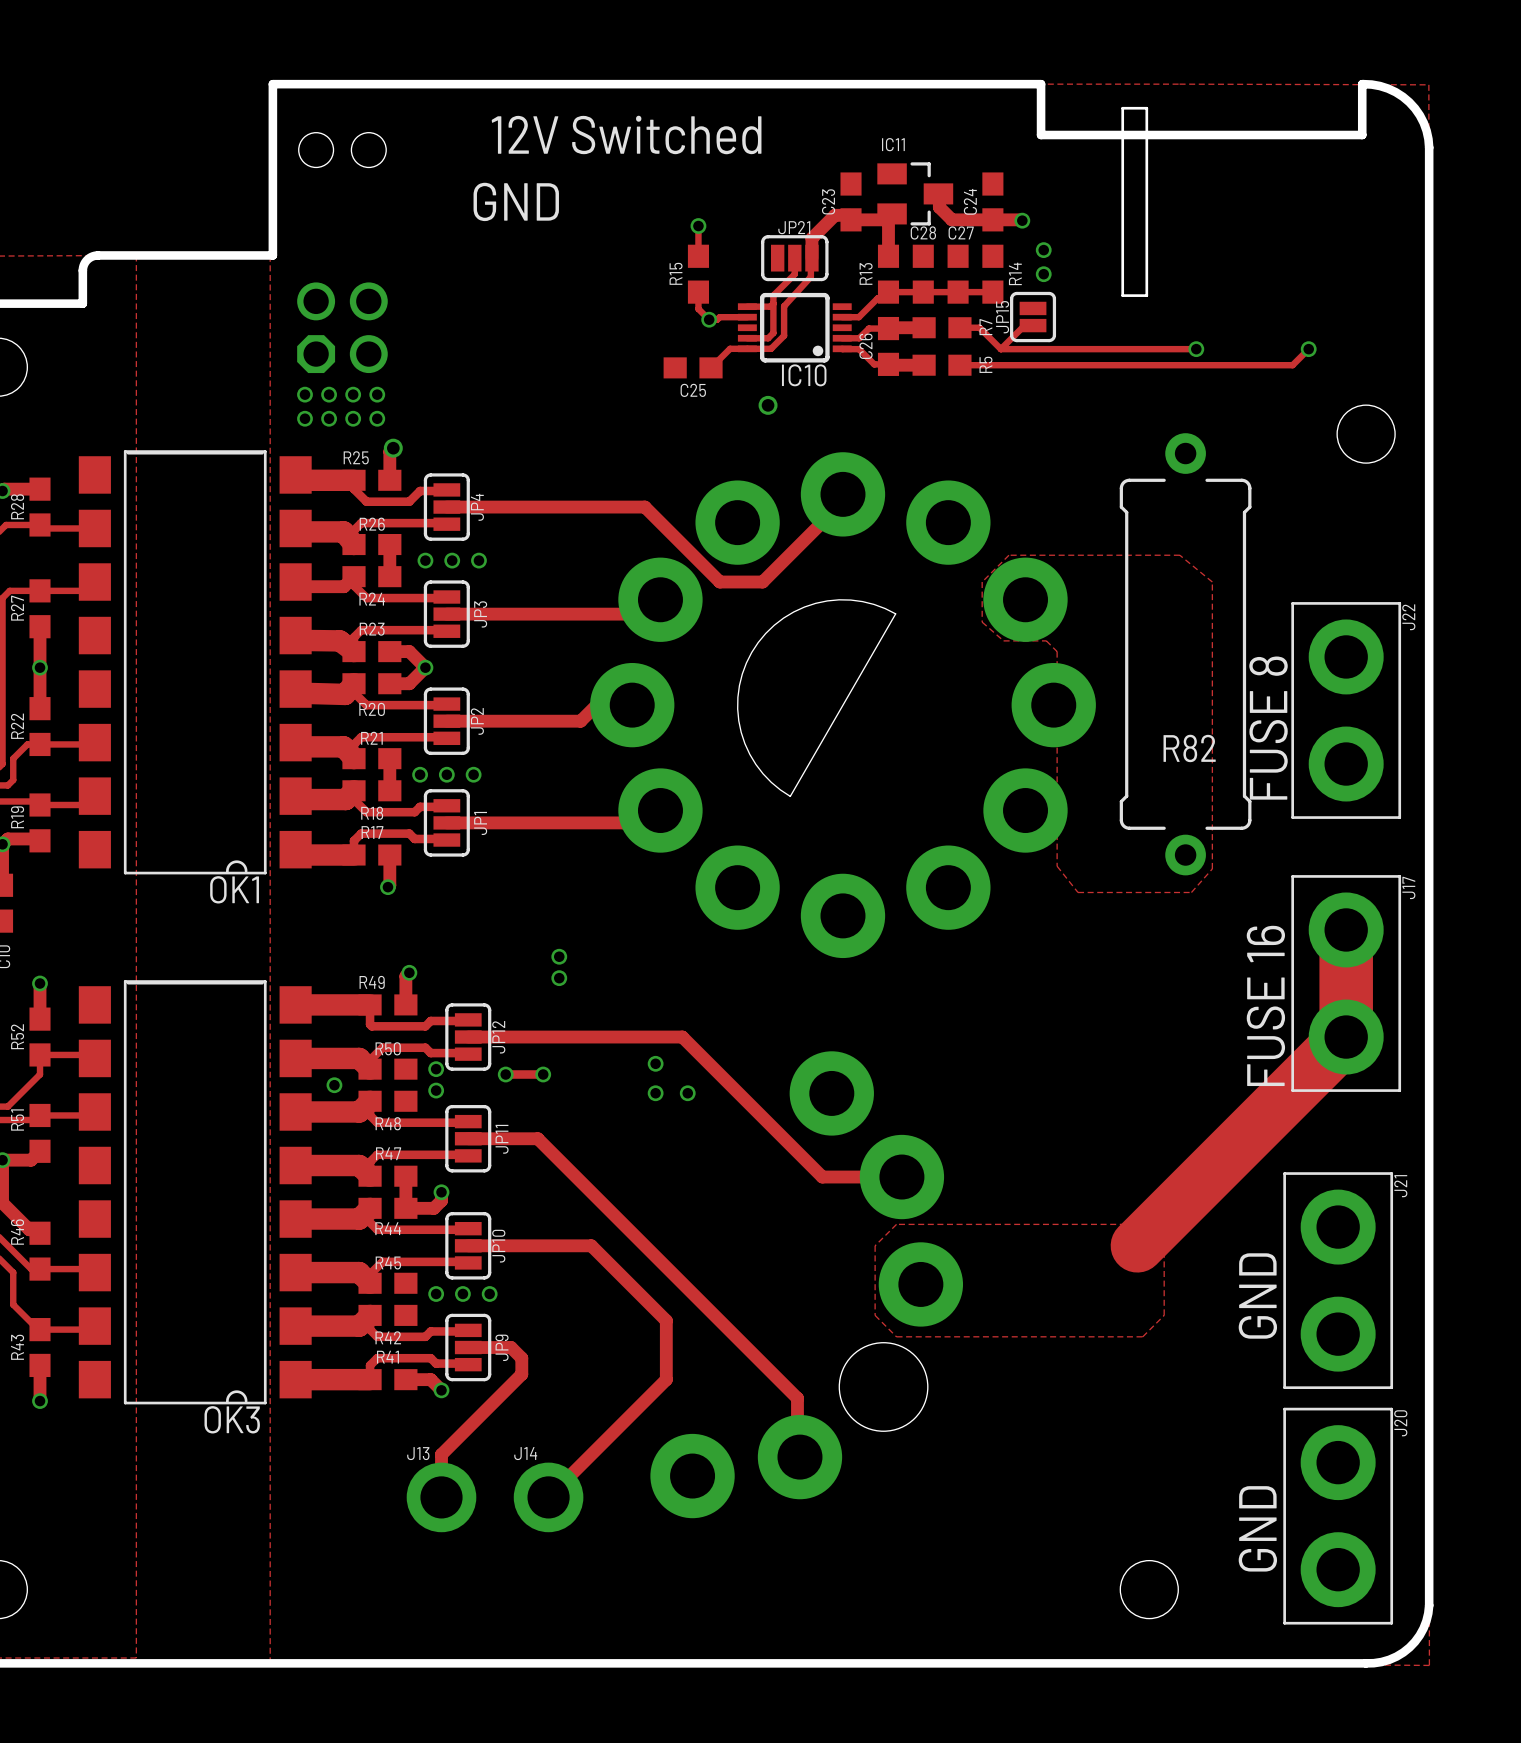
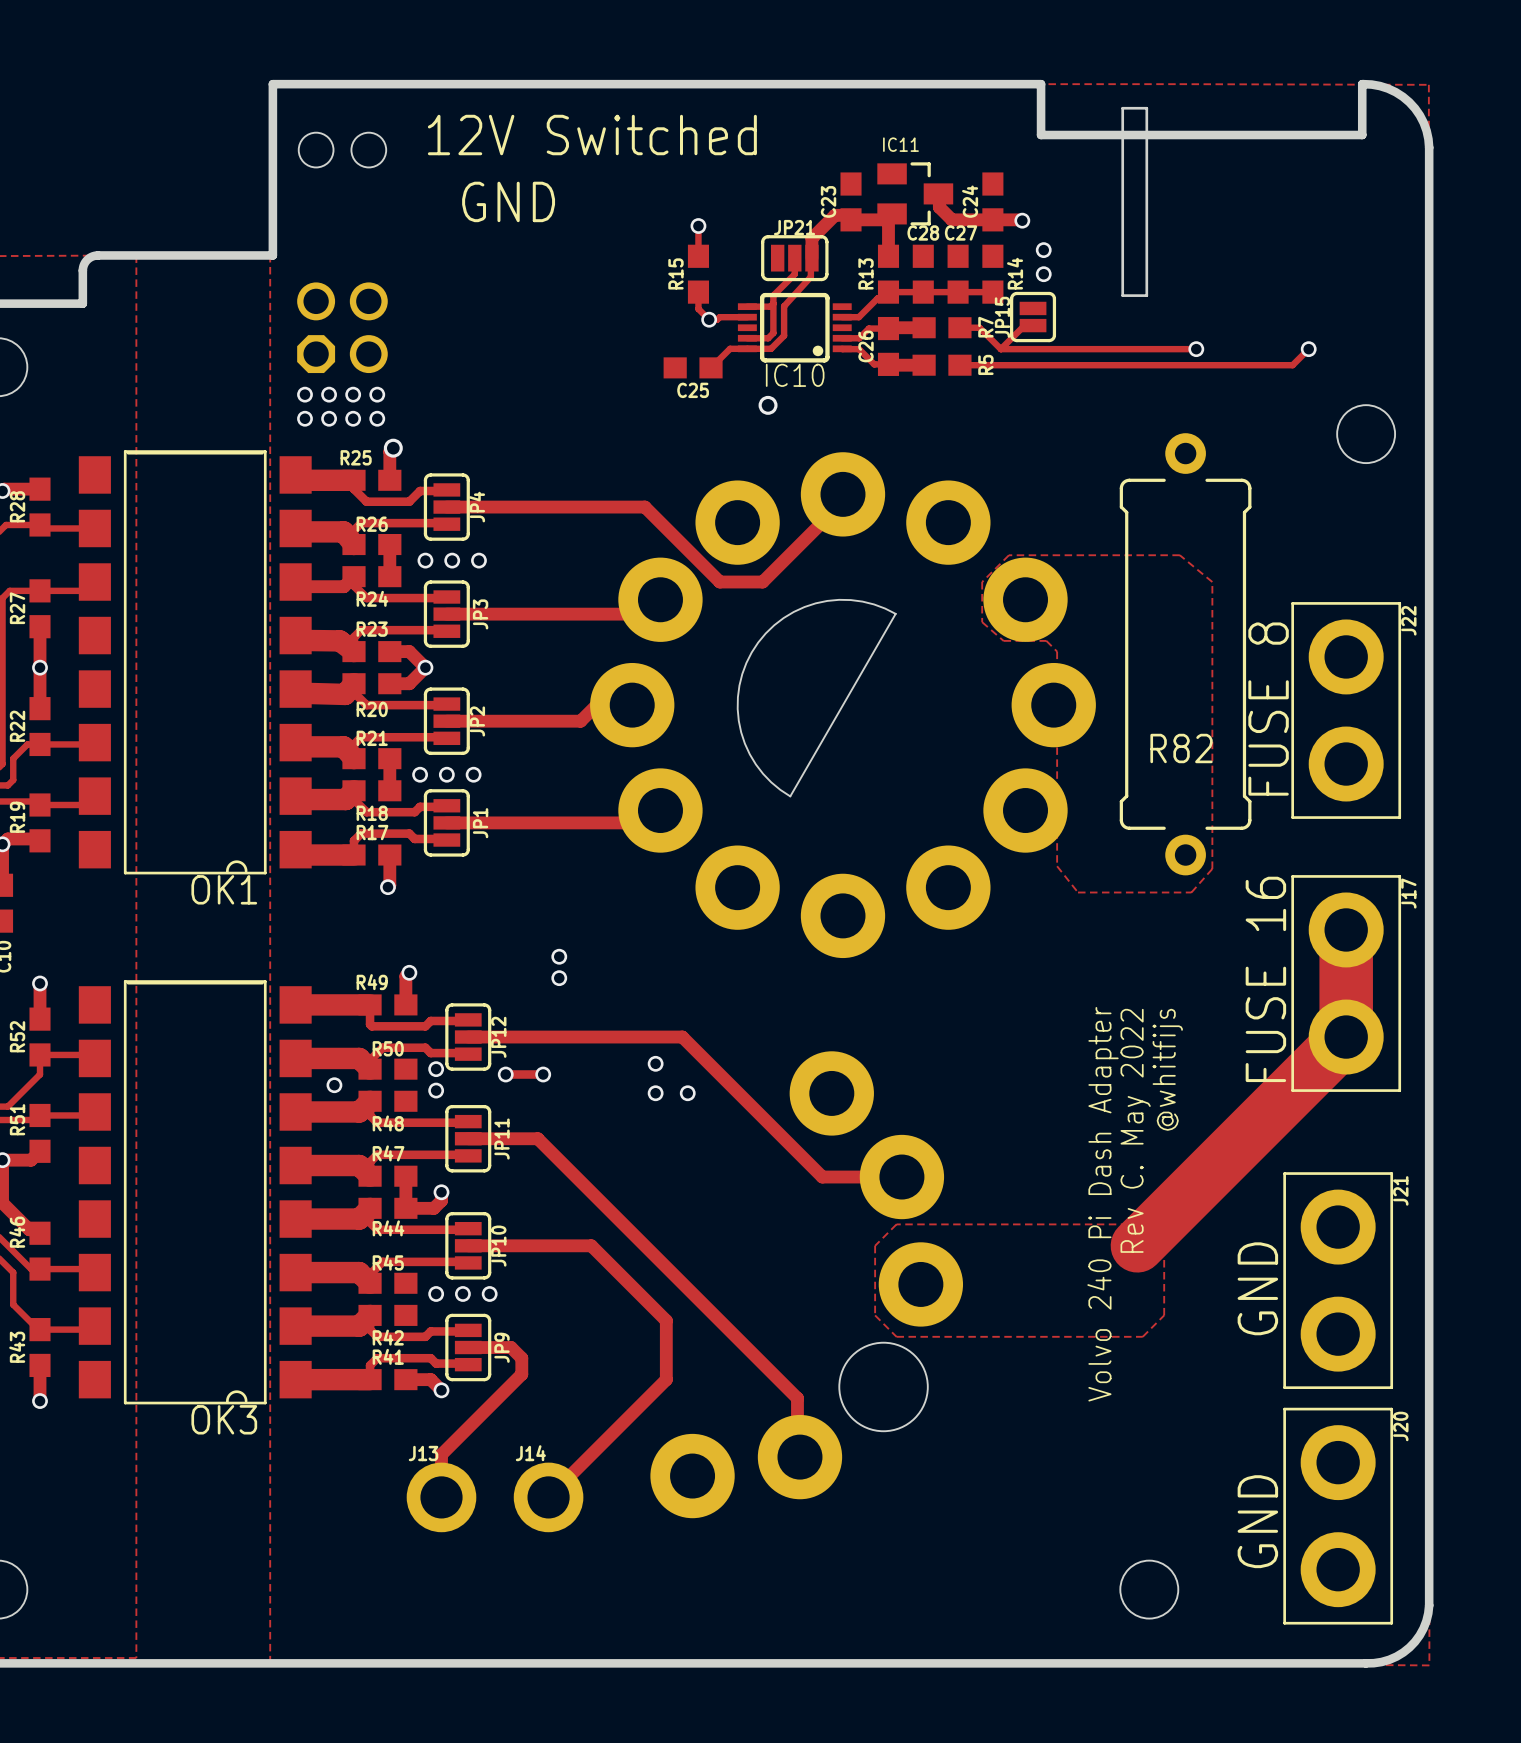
text: none -> @whitfijs (1167, 1069)
text: none -> Rev C. May 2022 (1135, 1130)
text: none -> Volvo 240 Pi Dash Adapter (1103, 1204)

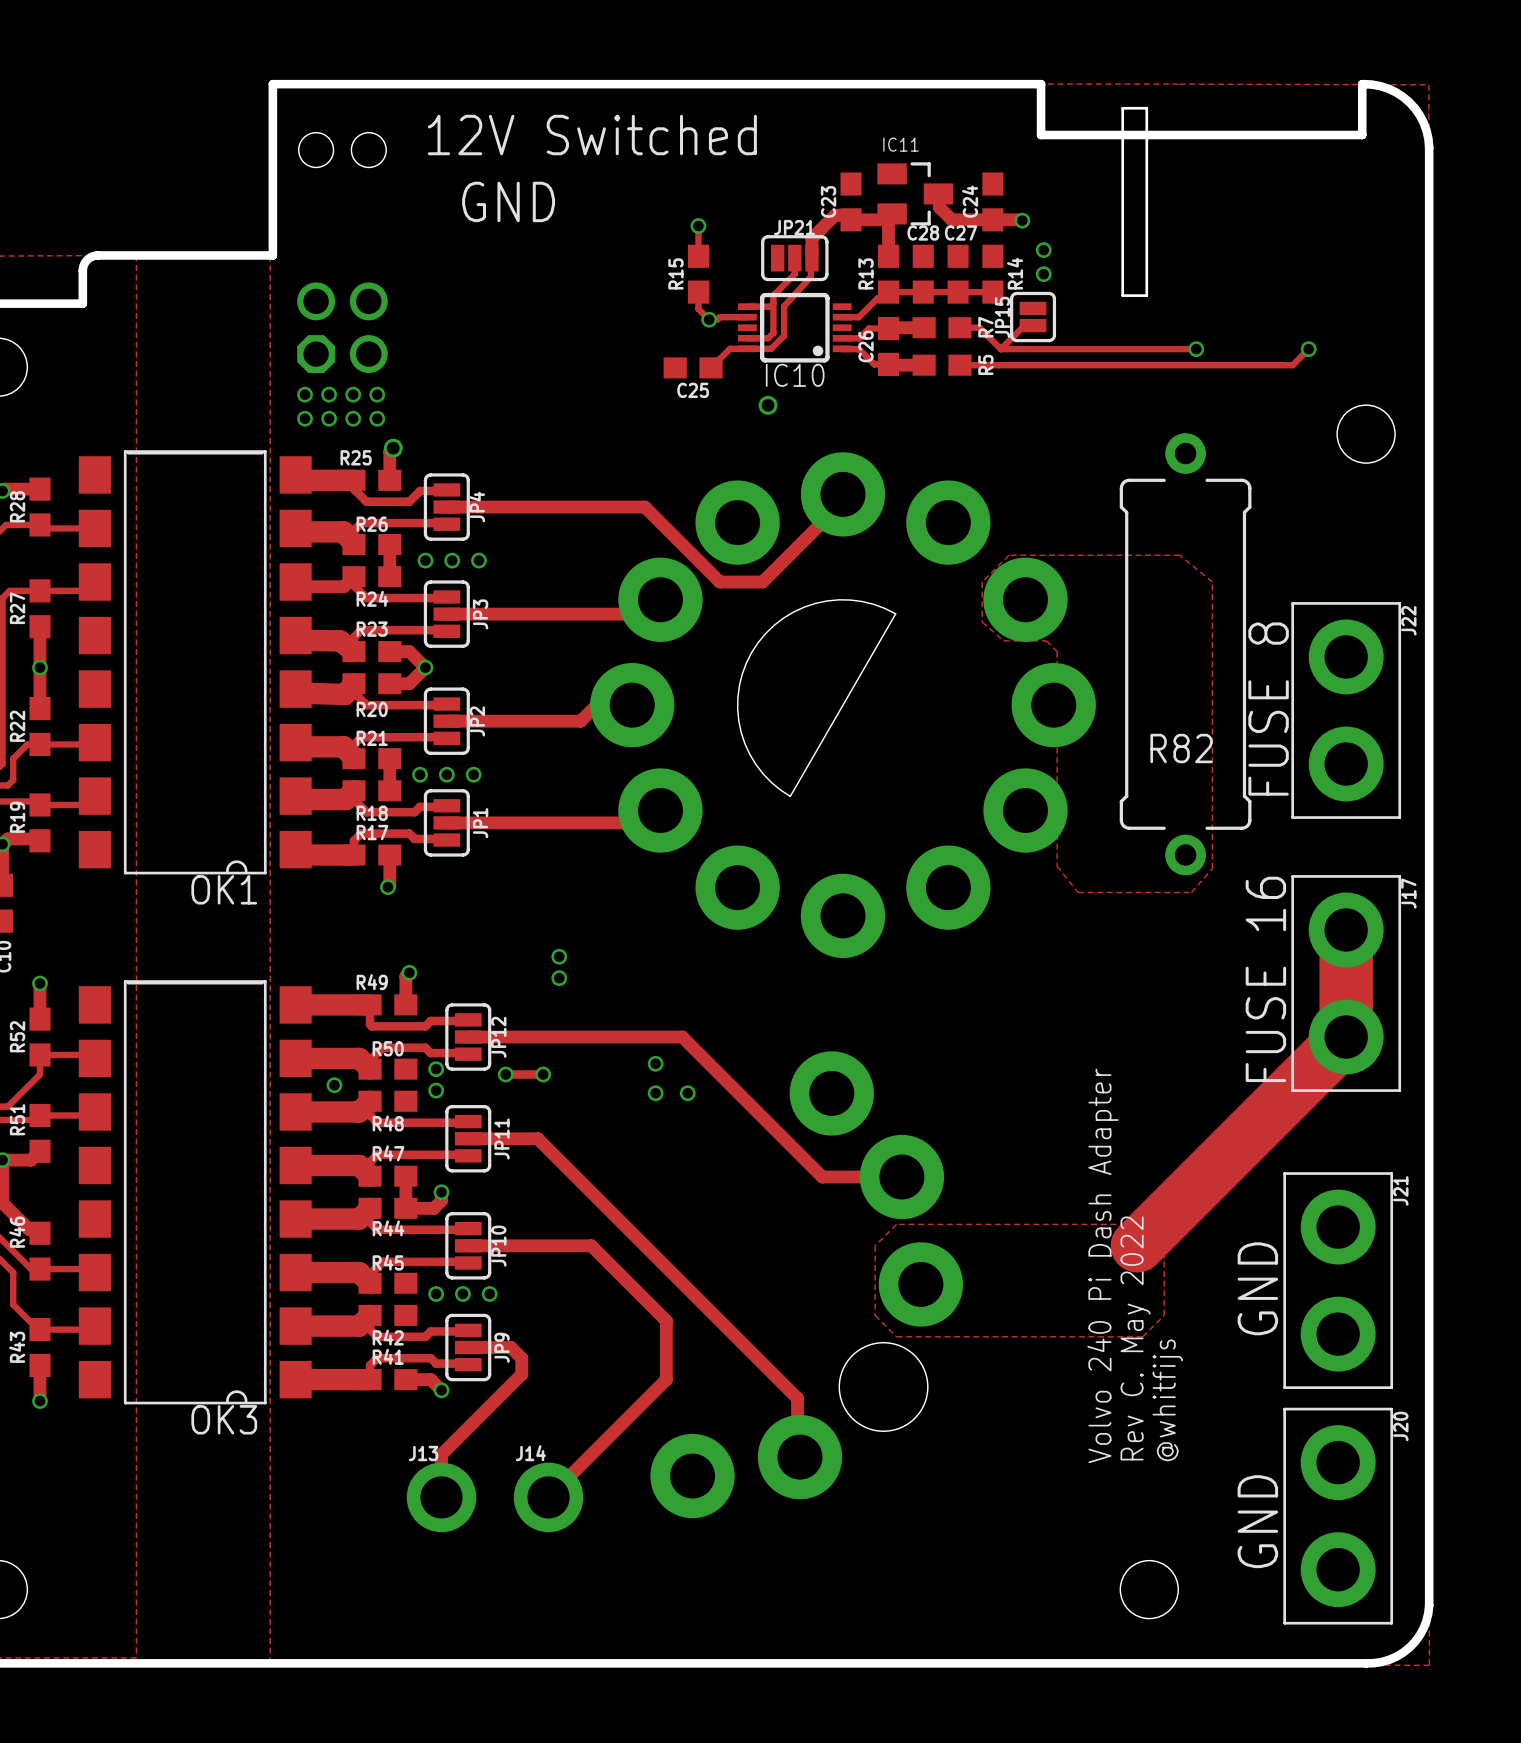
text position: @whitfijs (1167, 1069) -> @whitfijs (1167, 1400)
text position: Rev C. May 2022 (1135, 1130) -> Rev C. May 2022 (1135, 1338)
text position: Volvo 240 Pi Dash Adapter (1103, 1204) -> Volvo 240 Pi Dash Adapter (1103, 1265)

